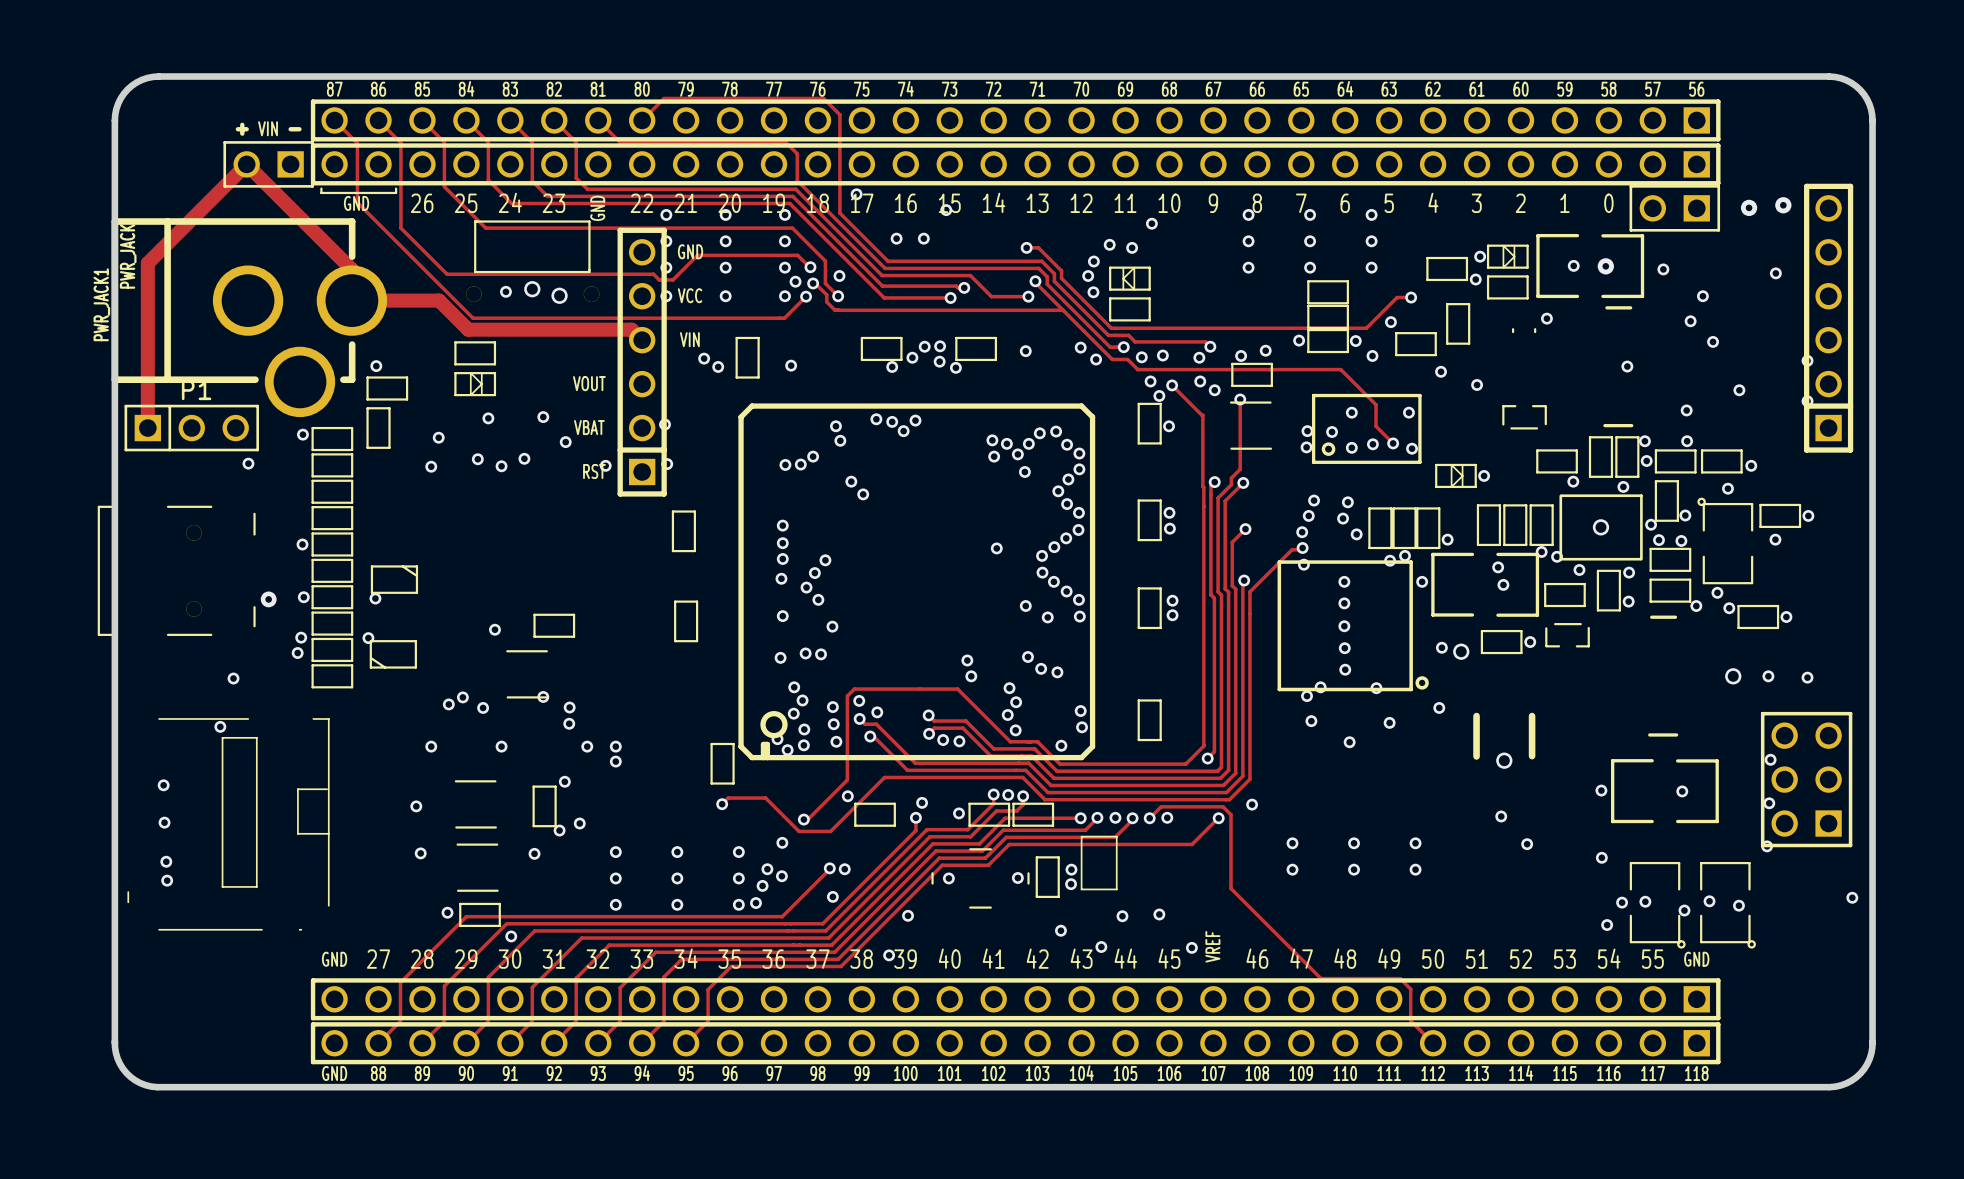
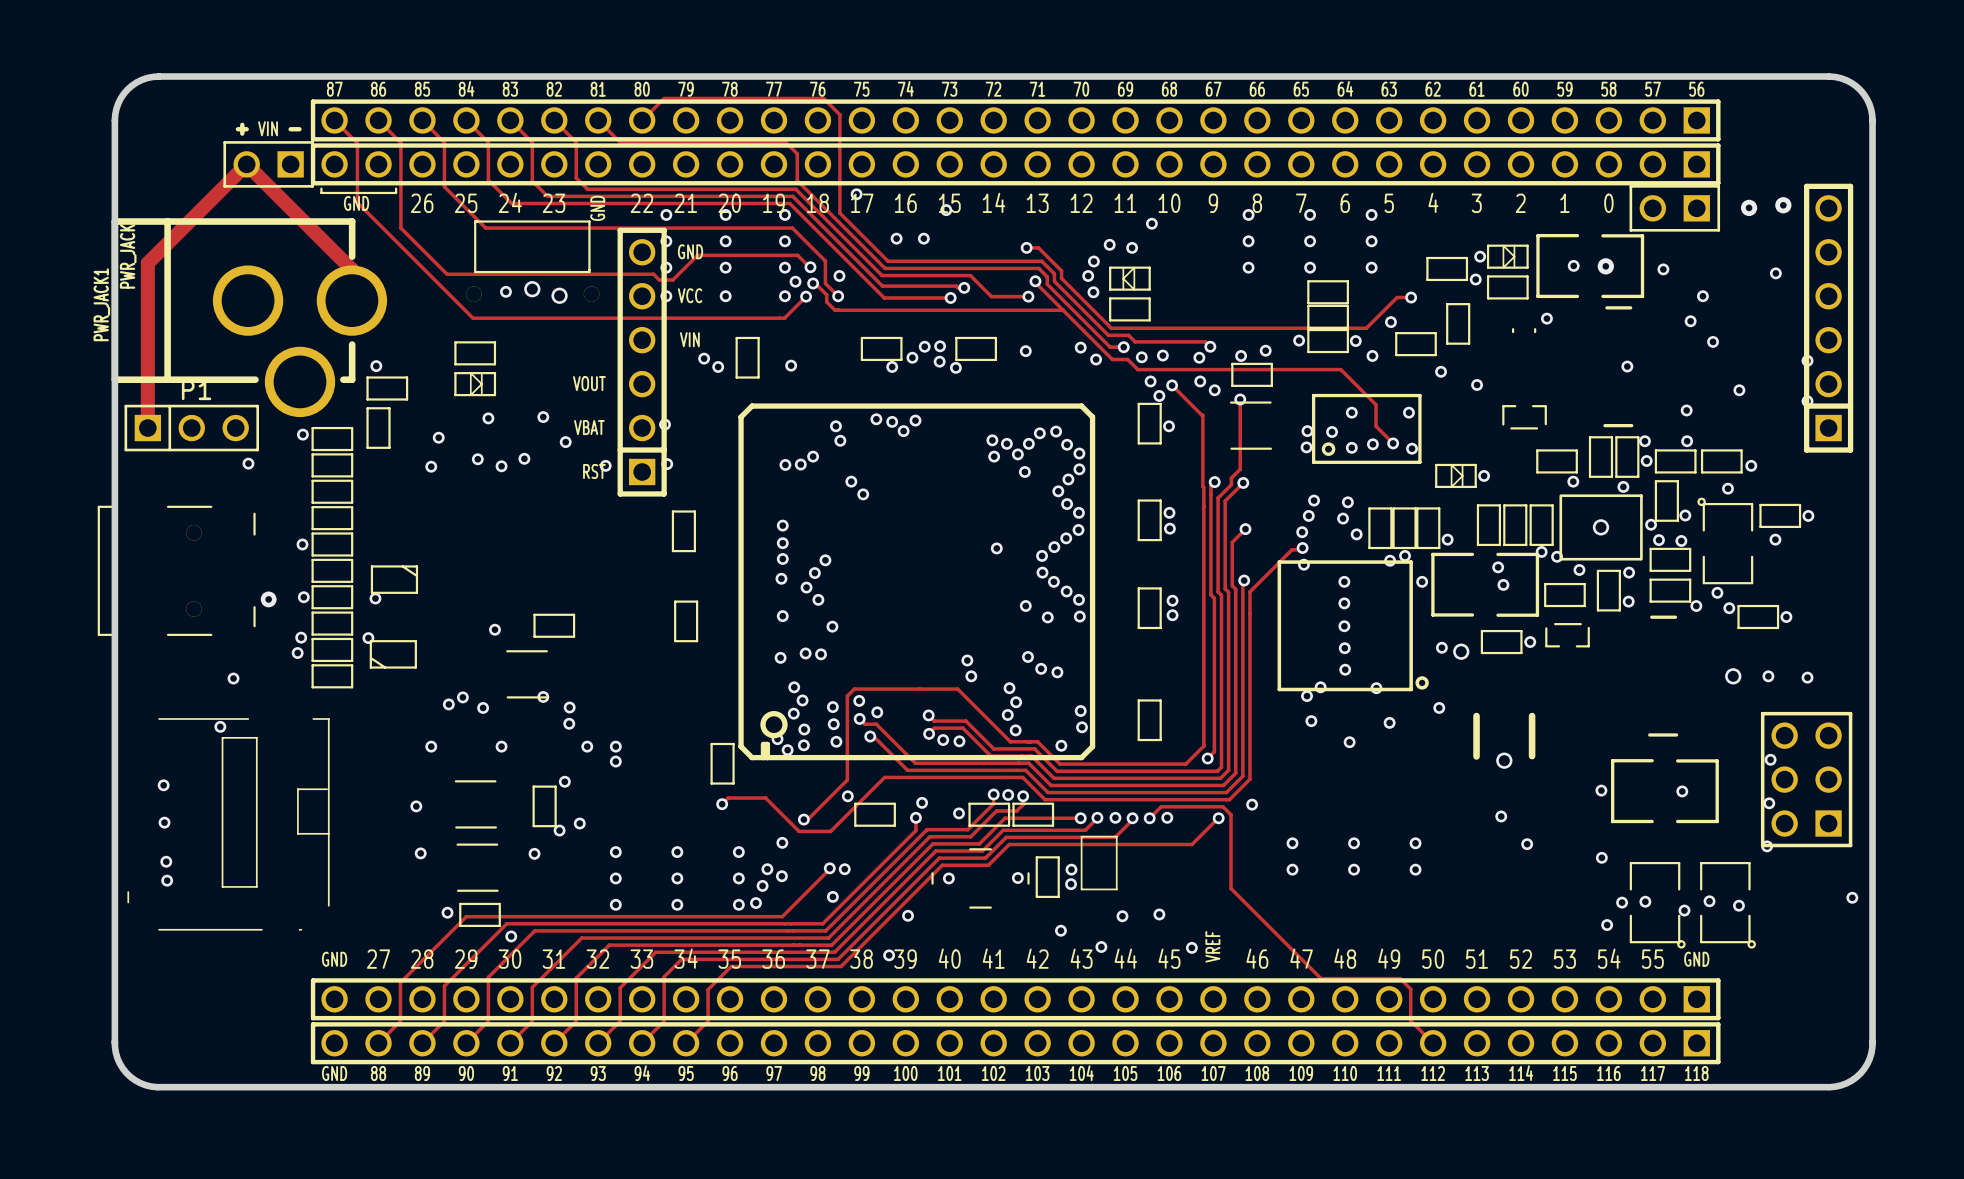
track: (351, 300) (439, 300) (468, 329) (631, 329) (642, 340) -> none

